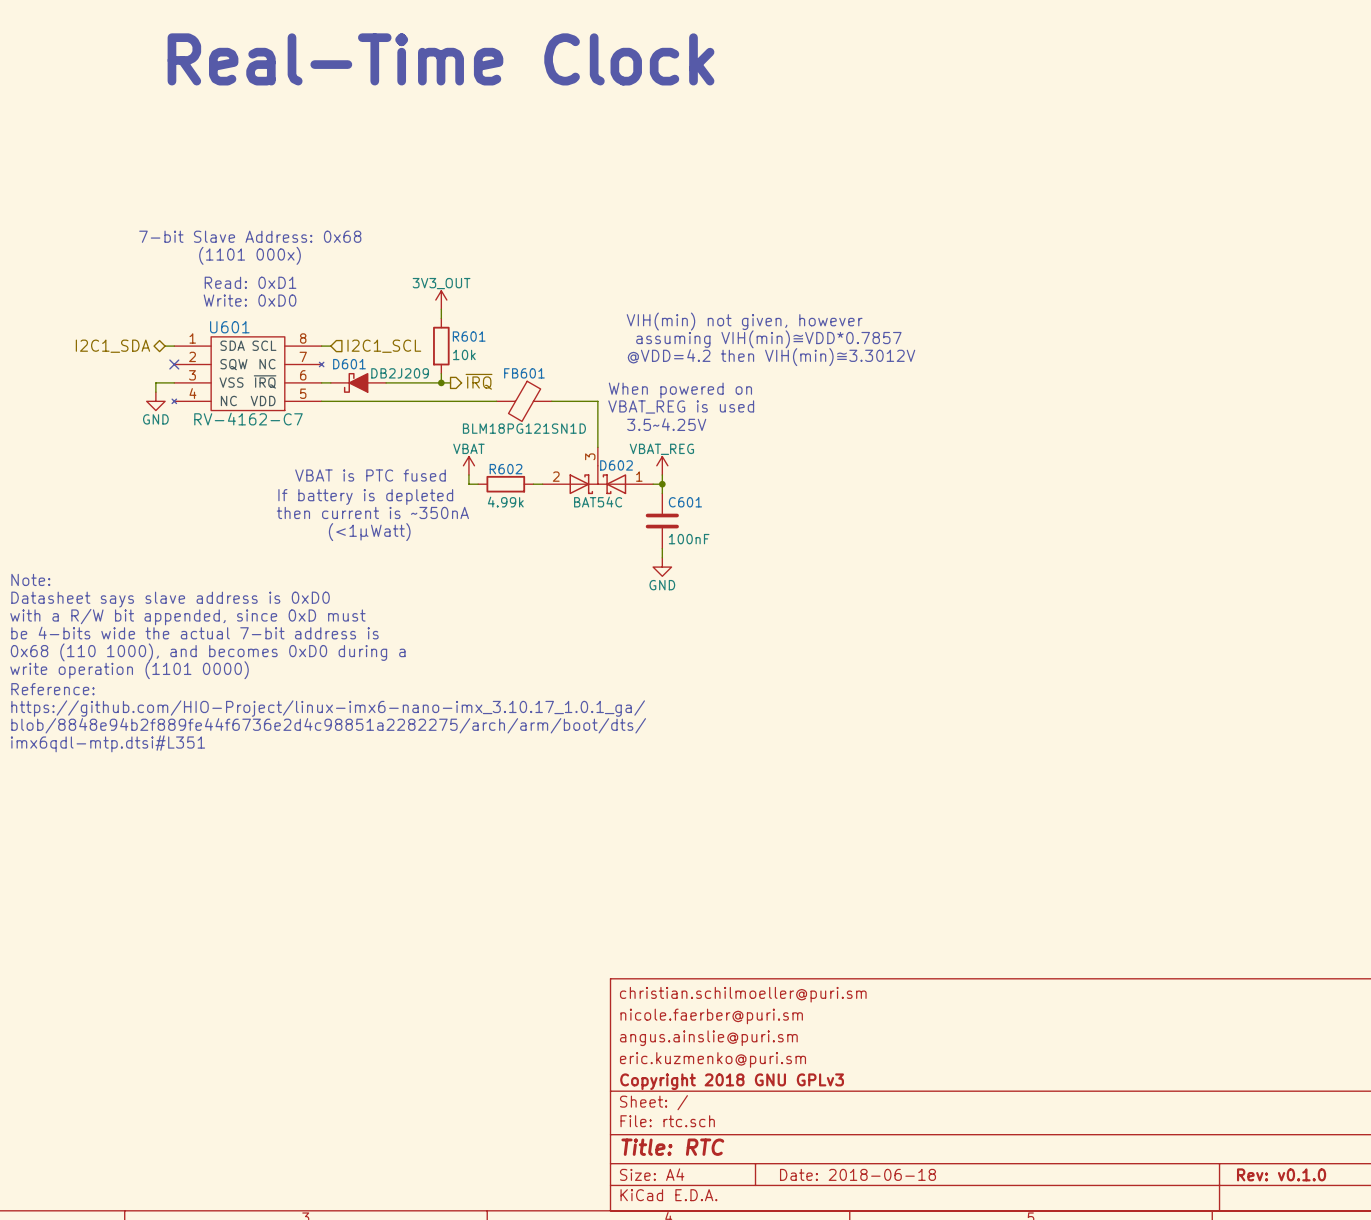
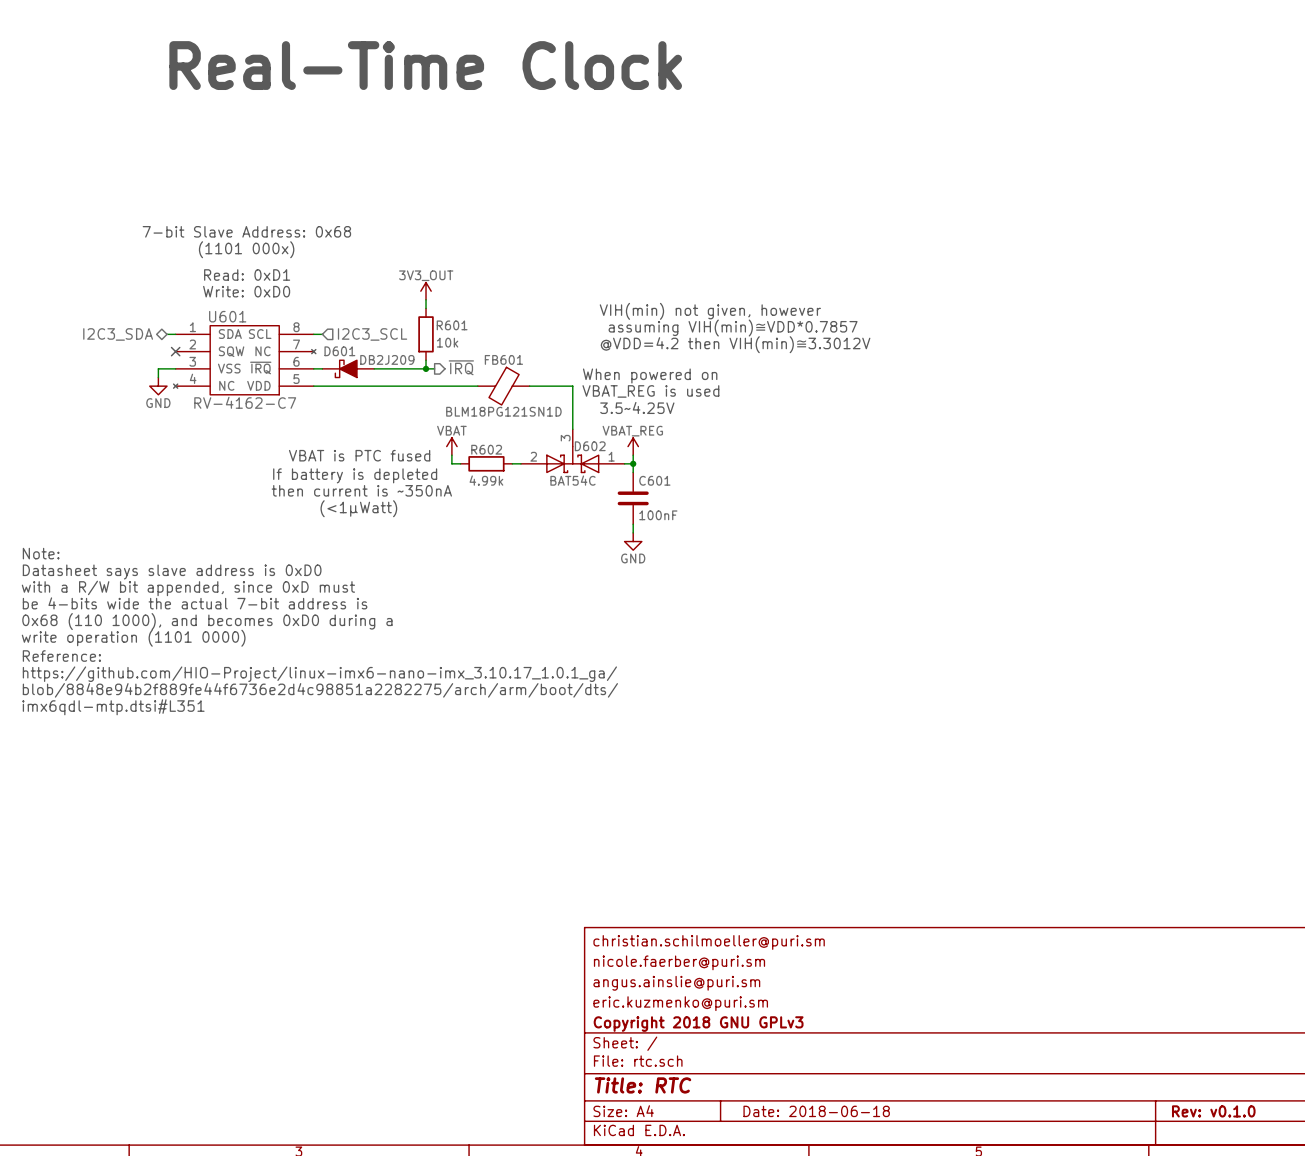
hierarchical label: I2C1_SDA (112, 346) -> I2C3_SDA (118, 334)
hierarchical label: I2C1_SCL (384, 346) -> I2C3_SCL (372, 334)

